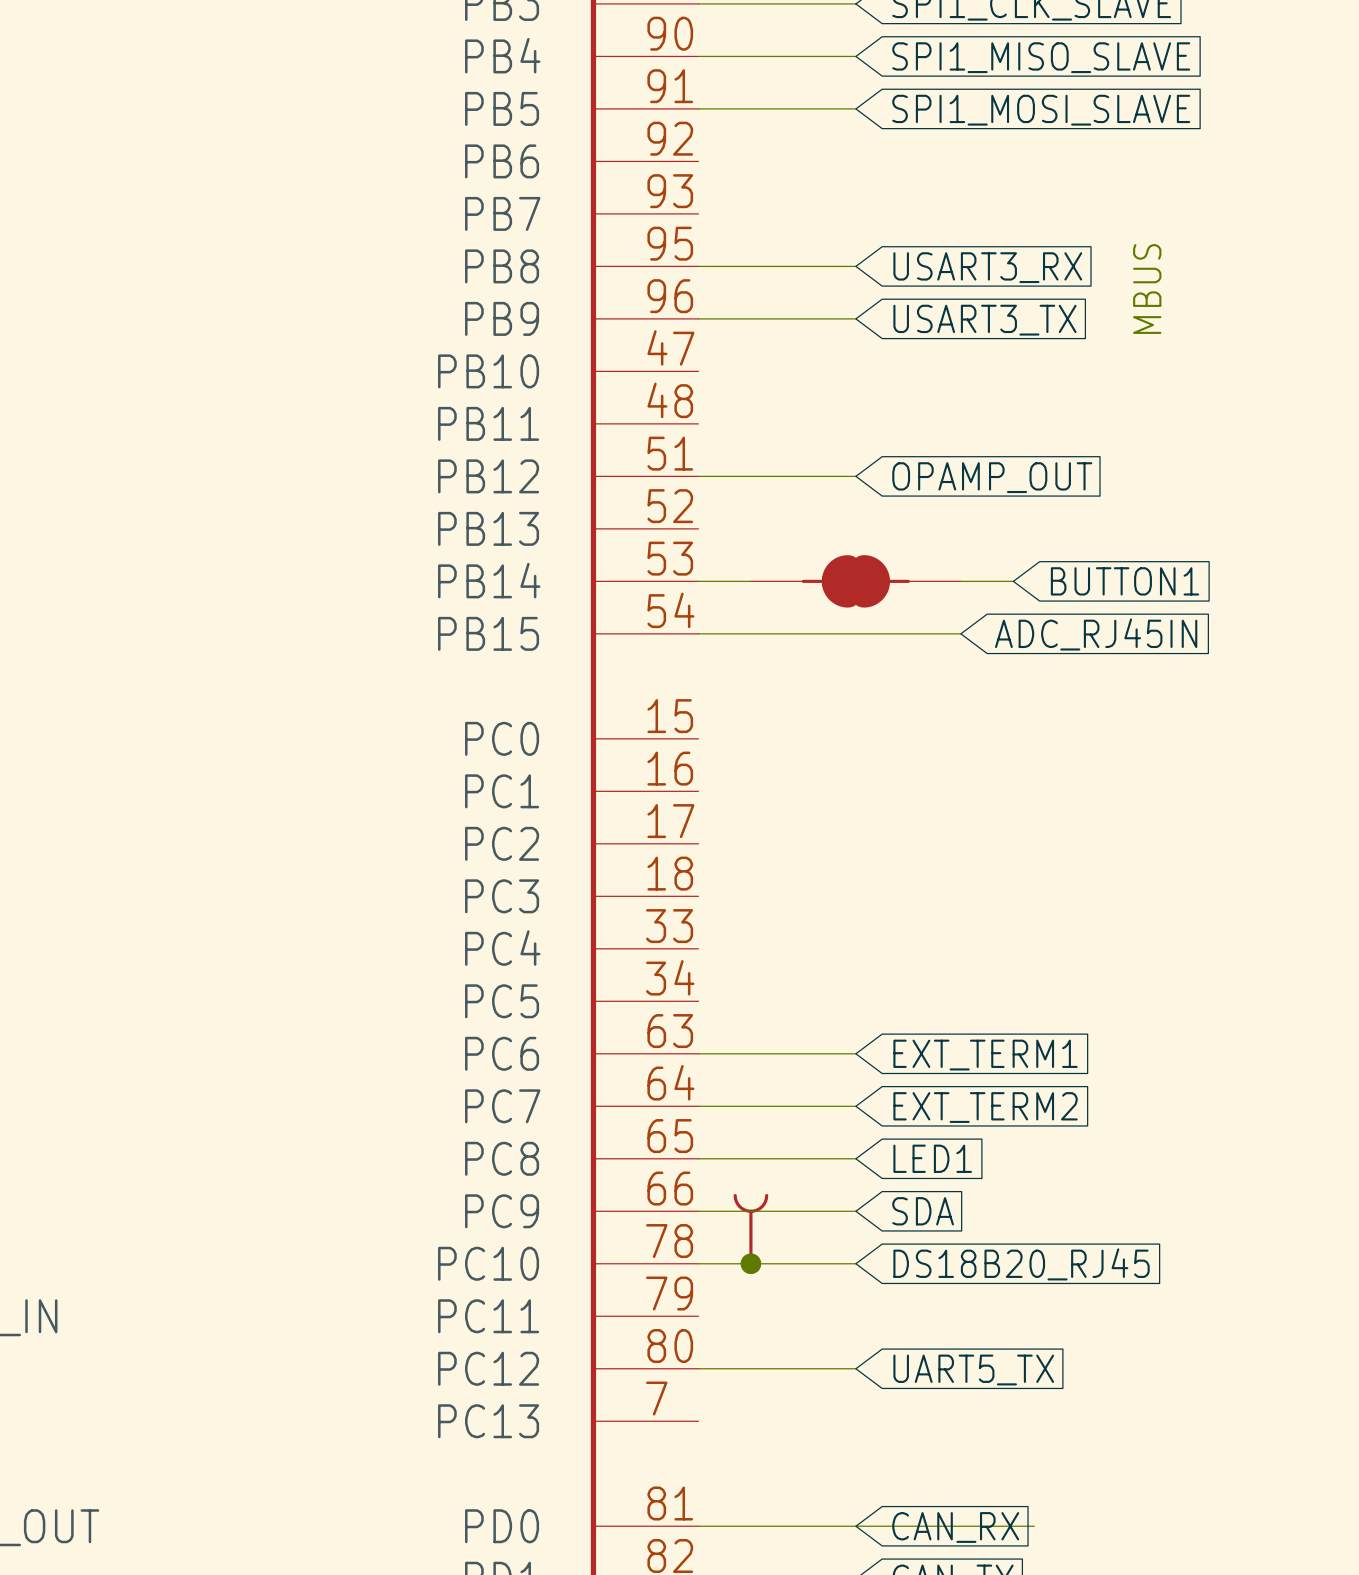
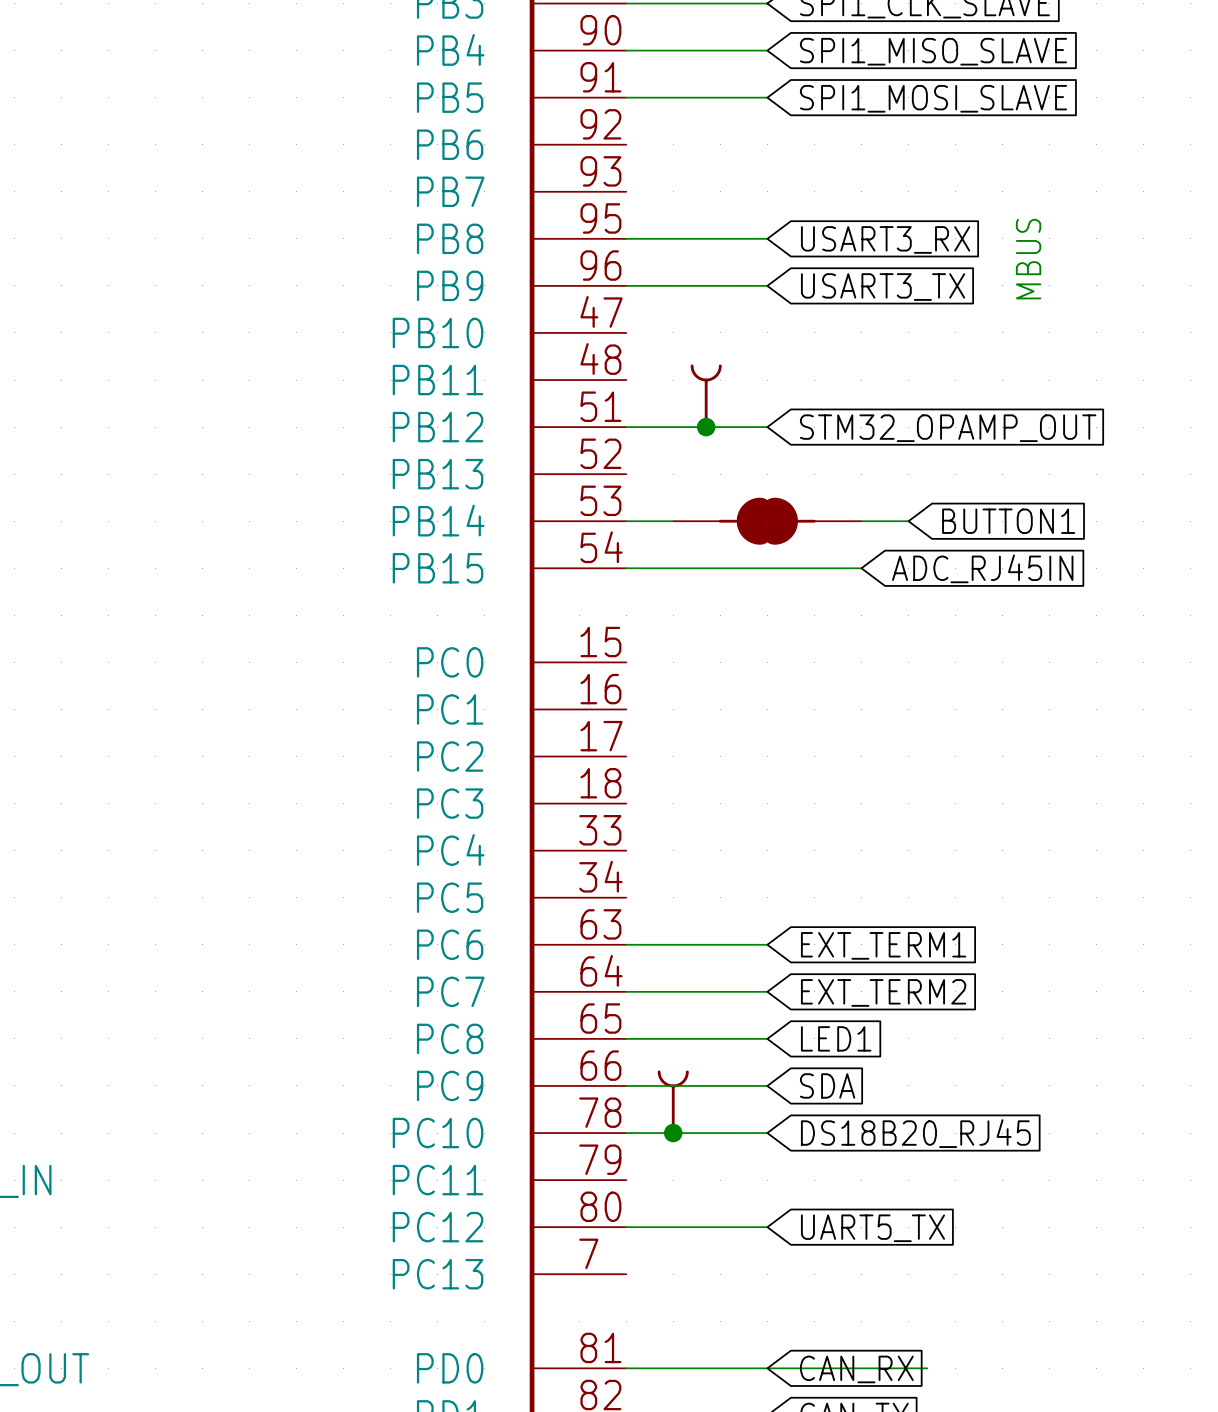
part: none -> (706, 396)
junction: none -> (706, 427)
global label: OPAMP_OUT (992, 477) -> STM32_OPAMP_OUT (948, 428)

